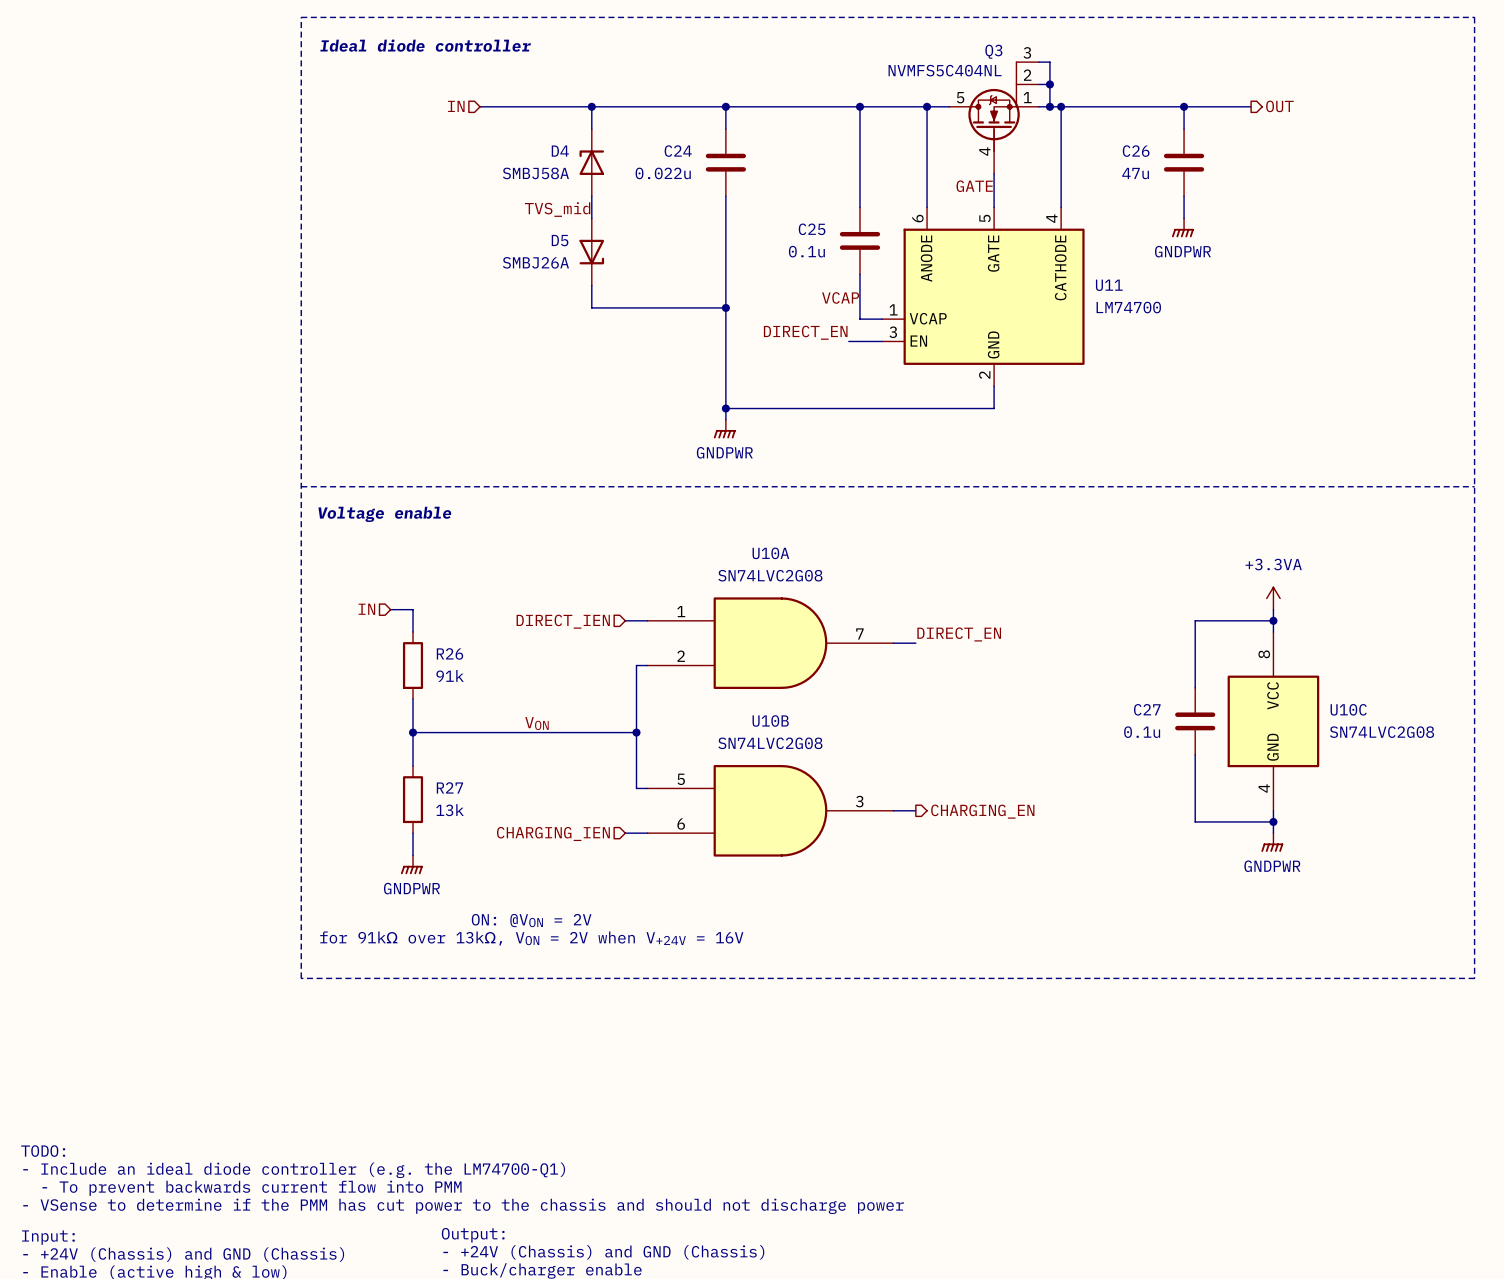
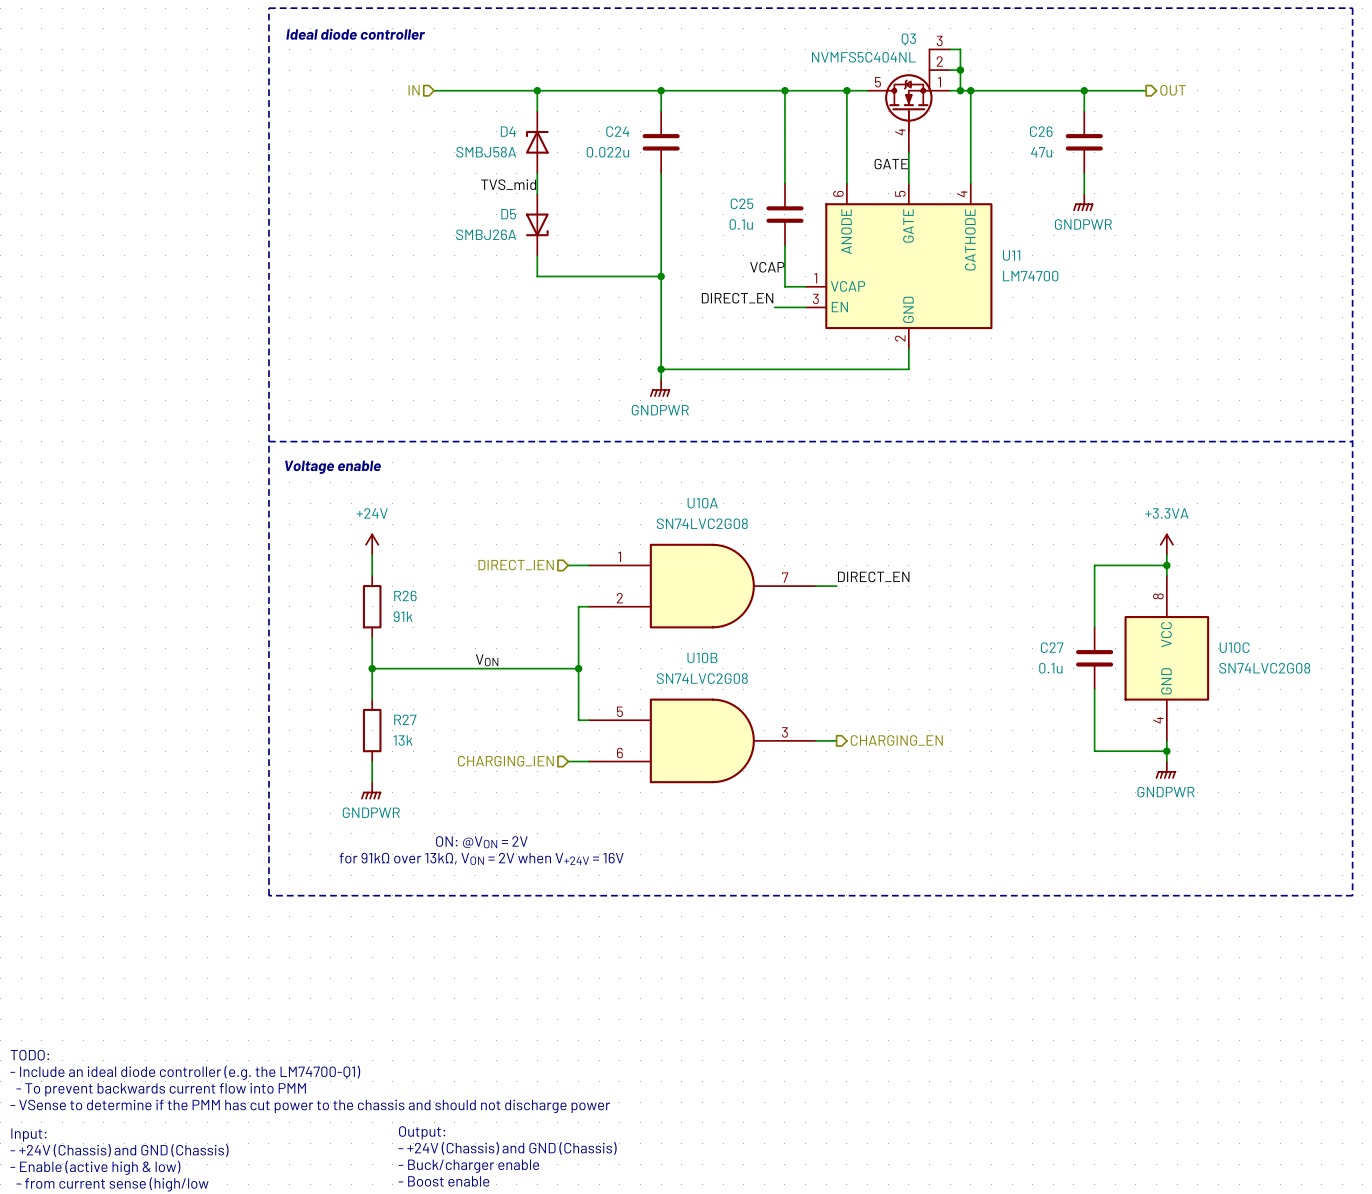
power symbol: none -> +24V (372, 544)
hierarchical label: IN (366, 609) -> none
wire: (390, 609) (413, 609) -> none

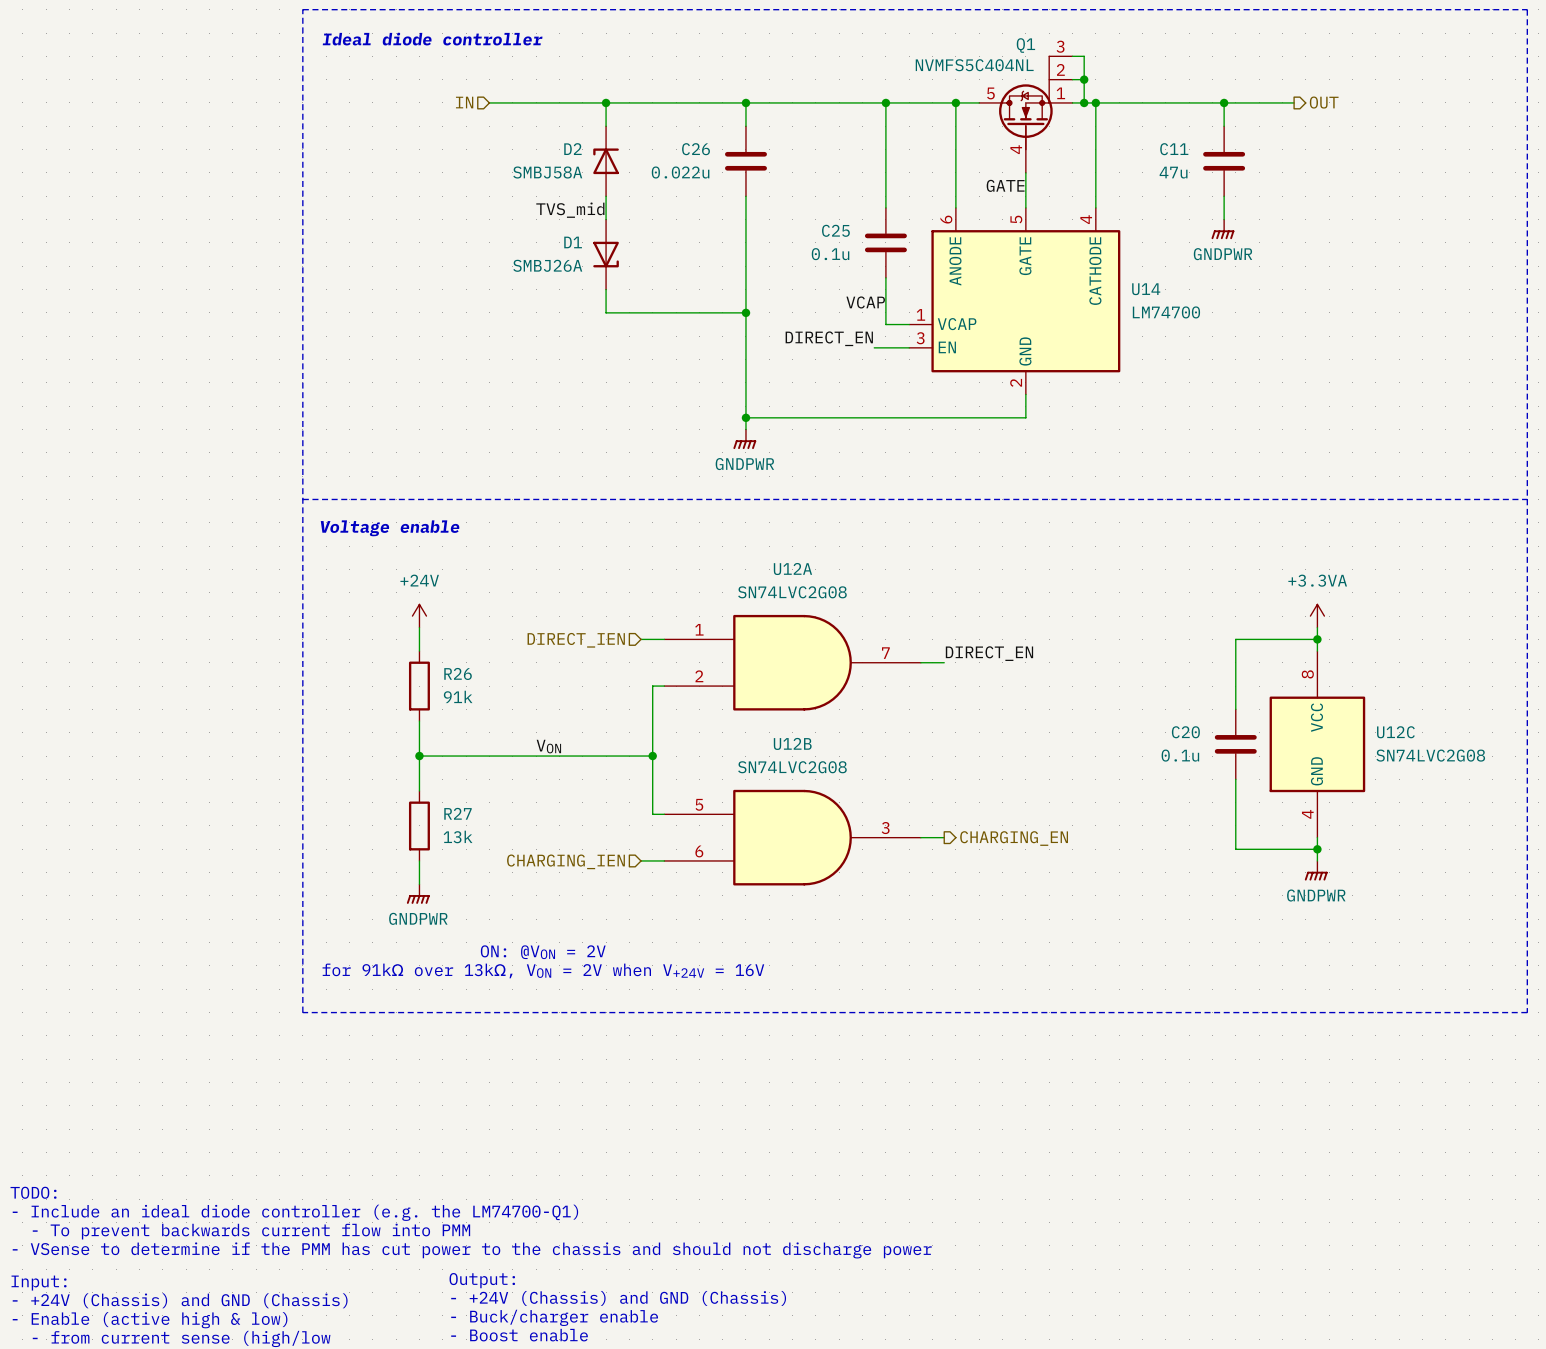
Q3 name: Q3 (908, 39) -> Q1 (1025, 45)
D4 name: D4 (508, 131) -> D2 (572, 149)
C24 name: C24 (617, 131) -> C26 (696, 149)
C26 name: C26 (1041, 131) -> C11 (1174, 149)
D5 name: D5 (508, 214) -> D1 (573, 242)
U11 name: U11 (1011, 255) -> U14 (1146, 289)
U10A name: U10A (702, 503) -> U12A (792, 569)
C27 name: C27 (1052, 647) -> C20 (1185, 732)
U10C name: U10C (1234, 647) -> U12C (1395, 732)
U10B name: U10B (702, 657) -> U12B (792, 743)

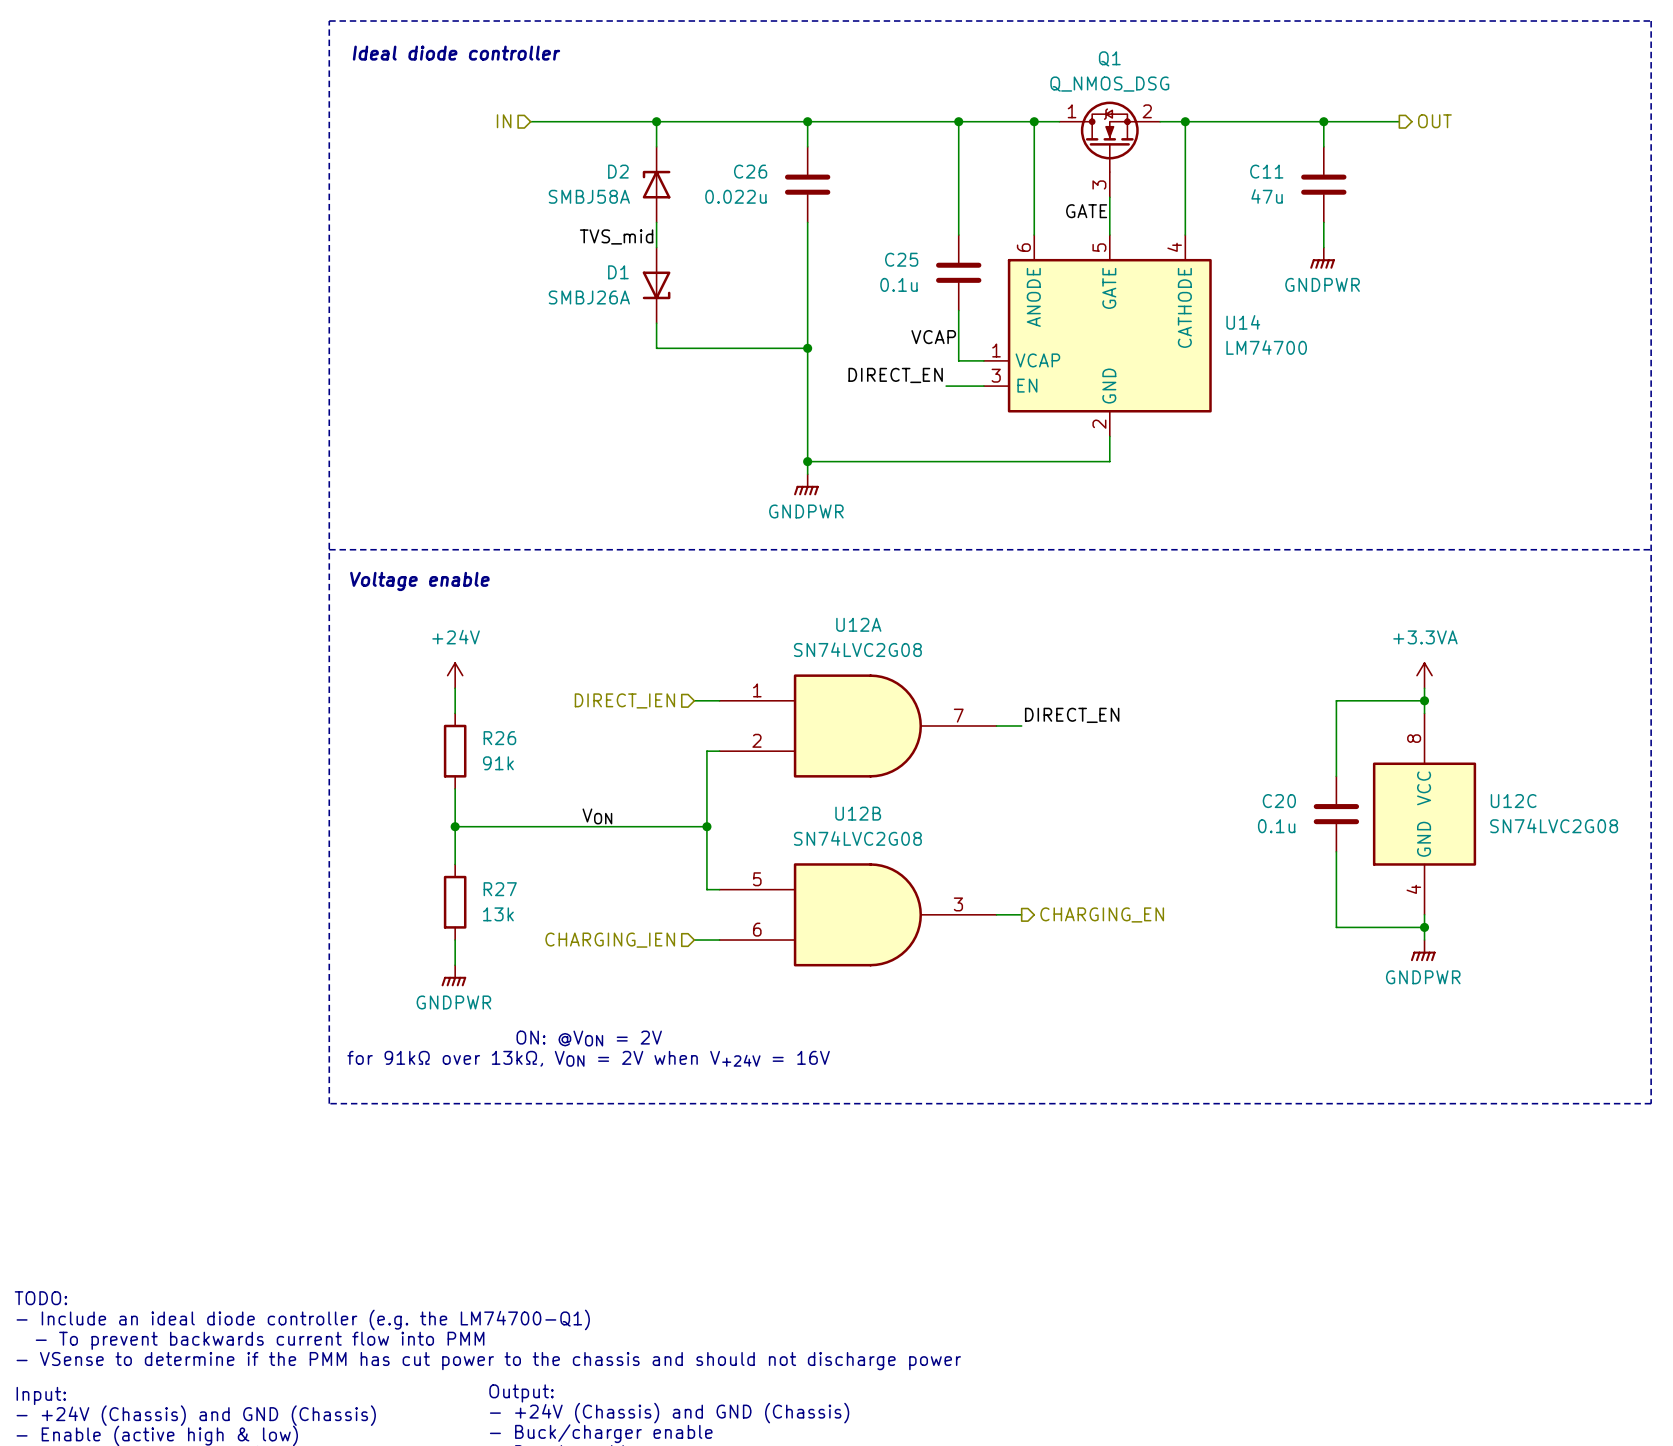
Q1 symbol: [979, 56, 1073, 173] -> [1059, 101, 1161, 198]
wire: (1072, 56) (1084, 56) (1084, 102) -> none
Q1 value: NVMFS5C404NL (974, 65) -> Q_NMOS_DSG (1109, 84)
wire: (1072, 79) (1084, 79) -> none
junction: (1084, 79) -> none
junction: (1084, 102) -> none

